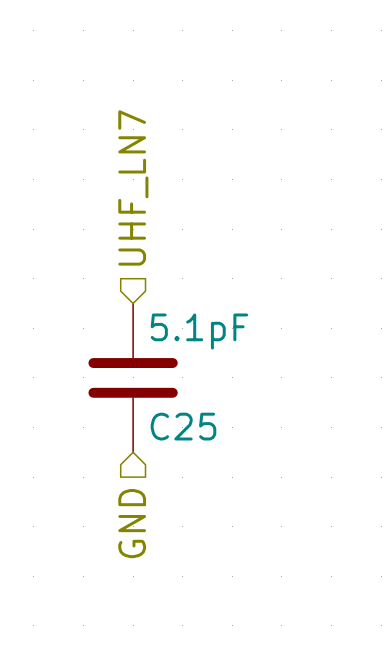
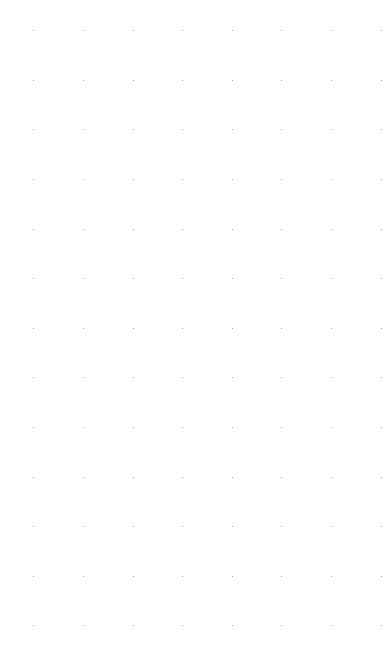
hierarchical label: UHF_LN7 (133, 187) -> none
C25: 5.1pF (133, 377) -> none
hierarchical label: GND (132, 523) -> none

